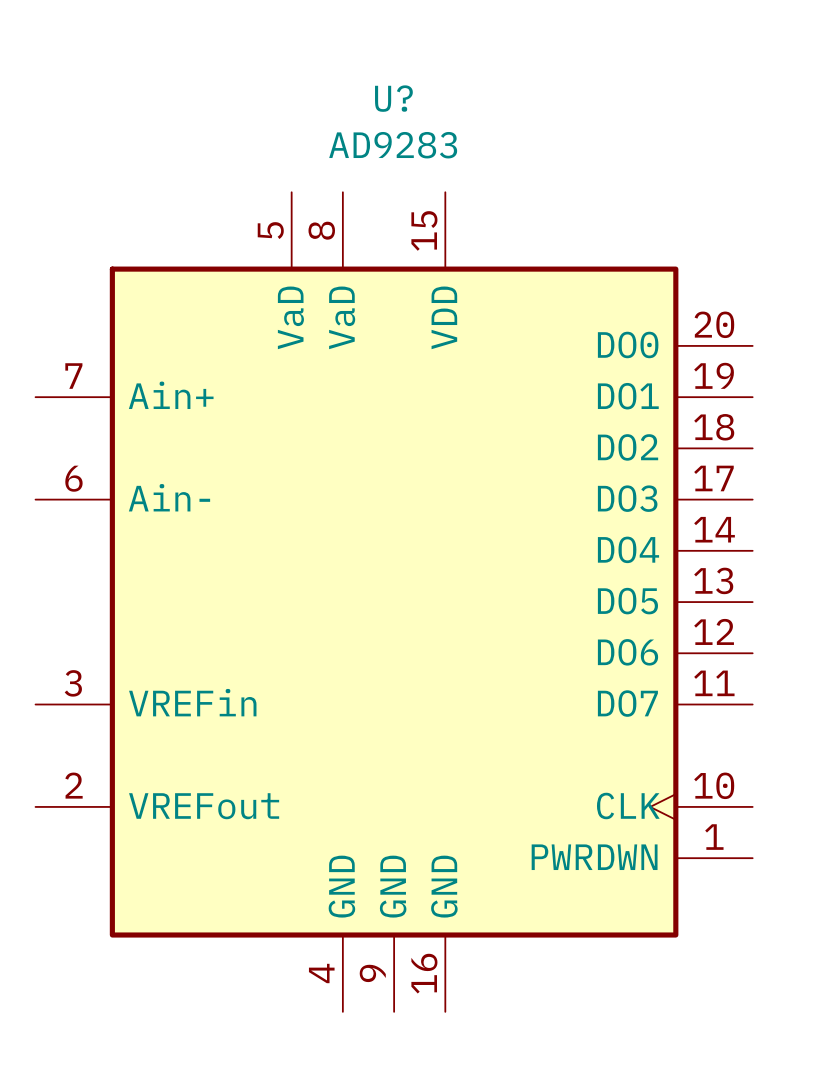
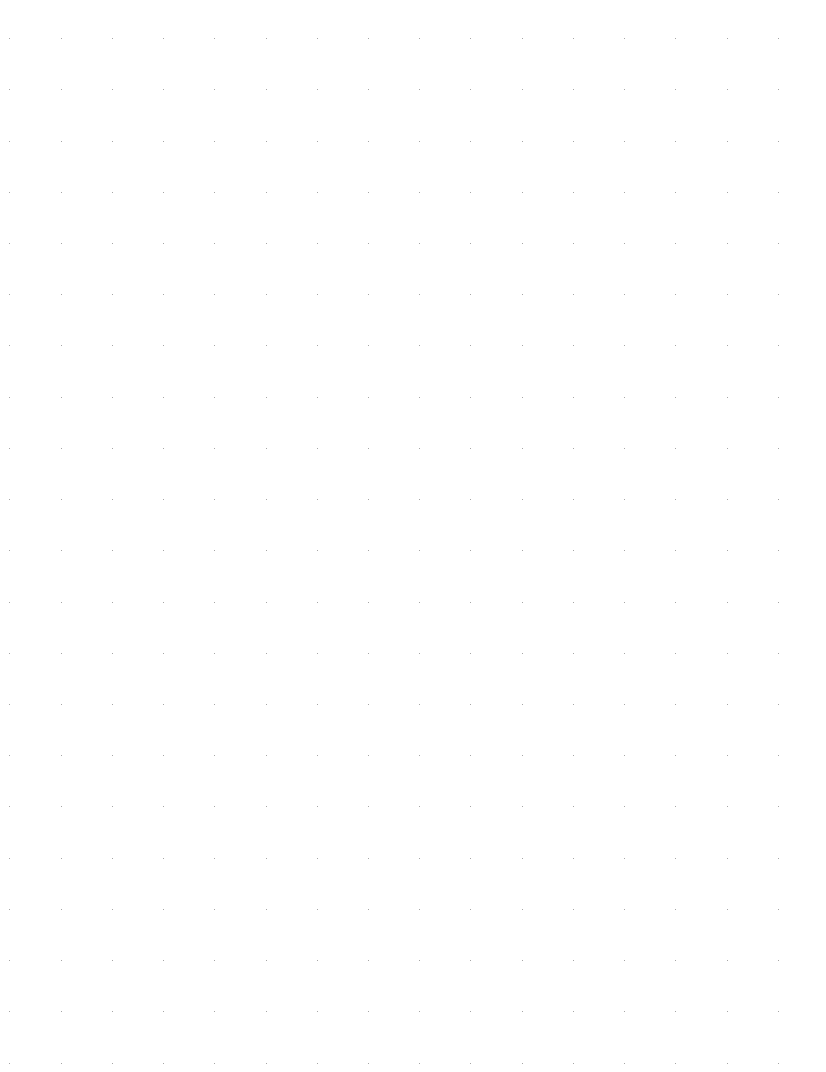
U?: AD9283 (394, 602) -> none

